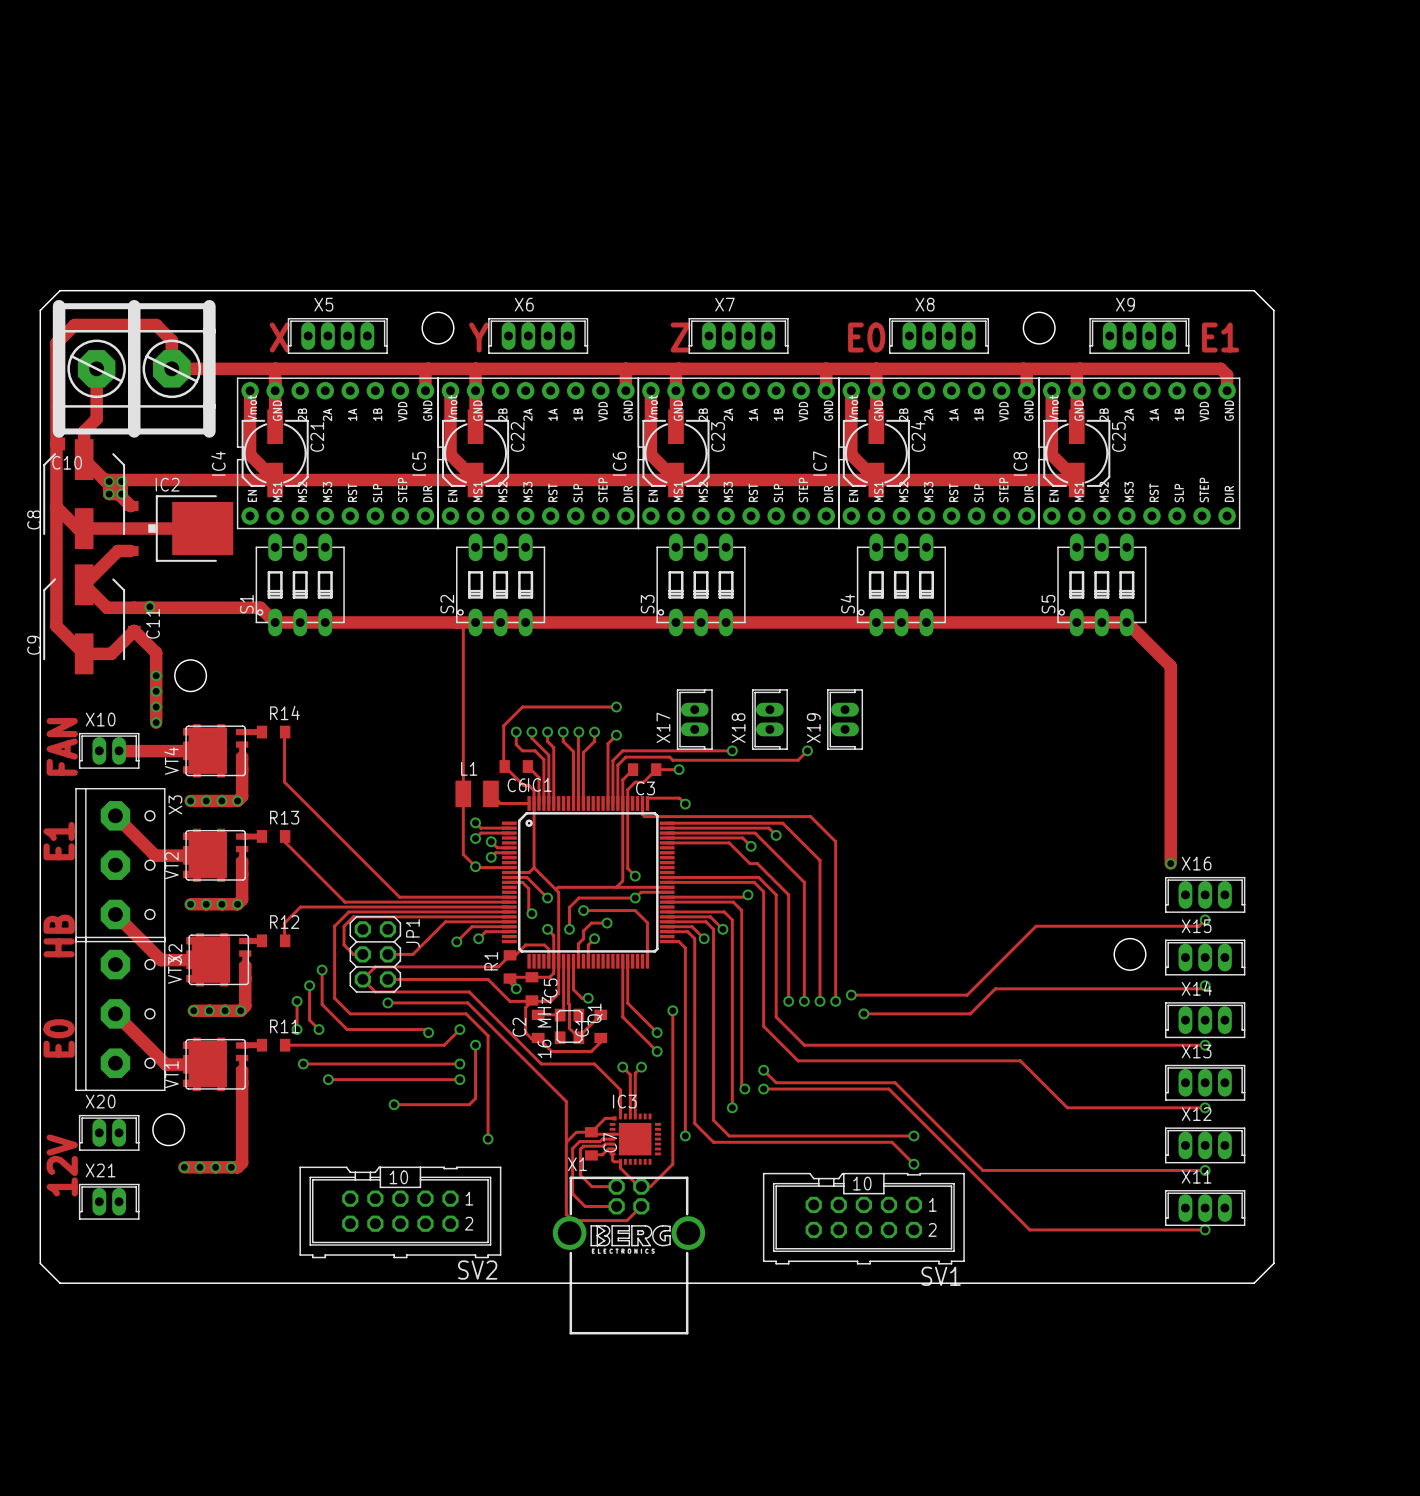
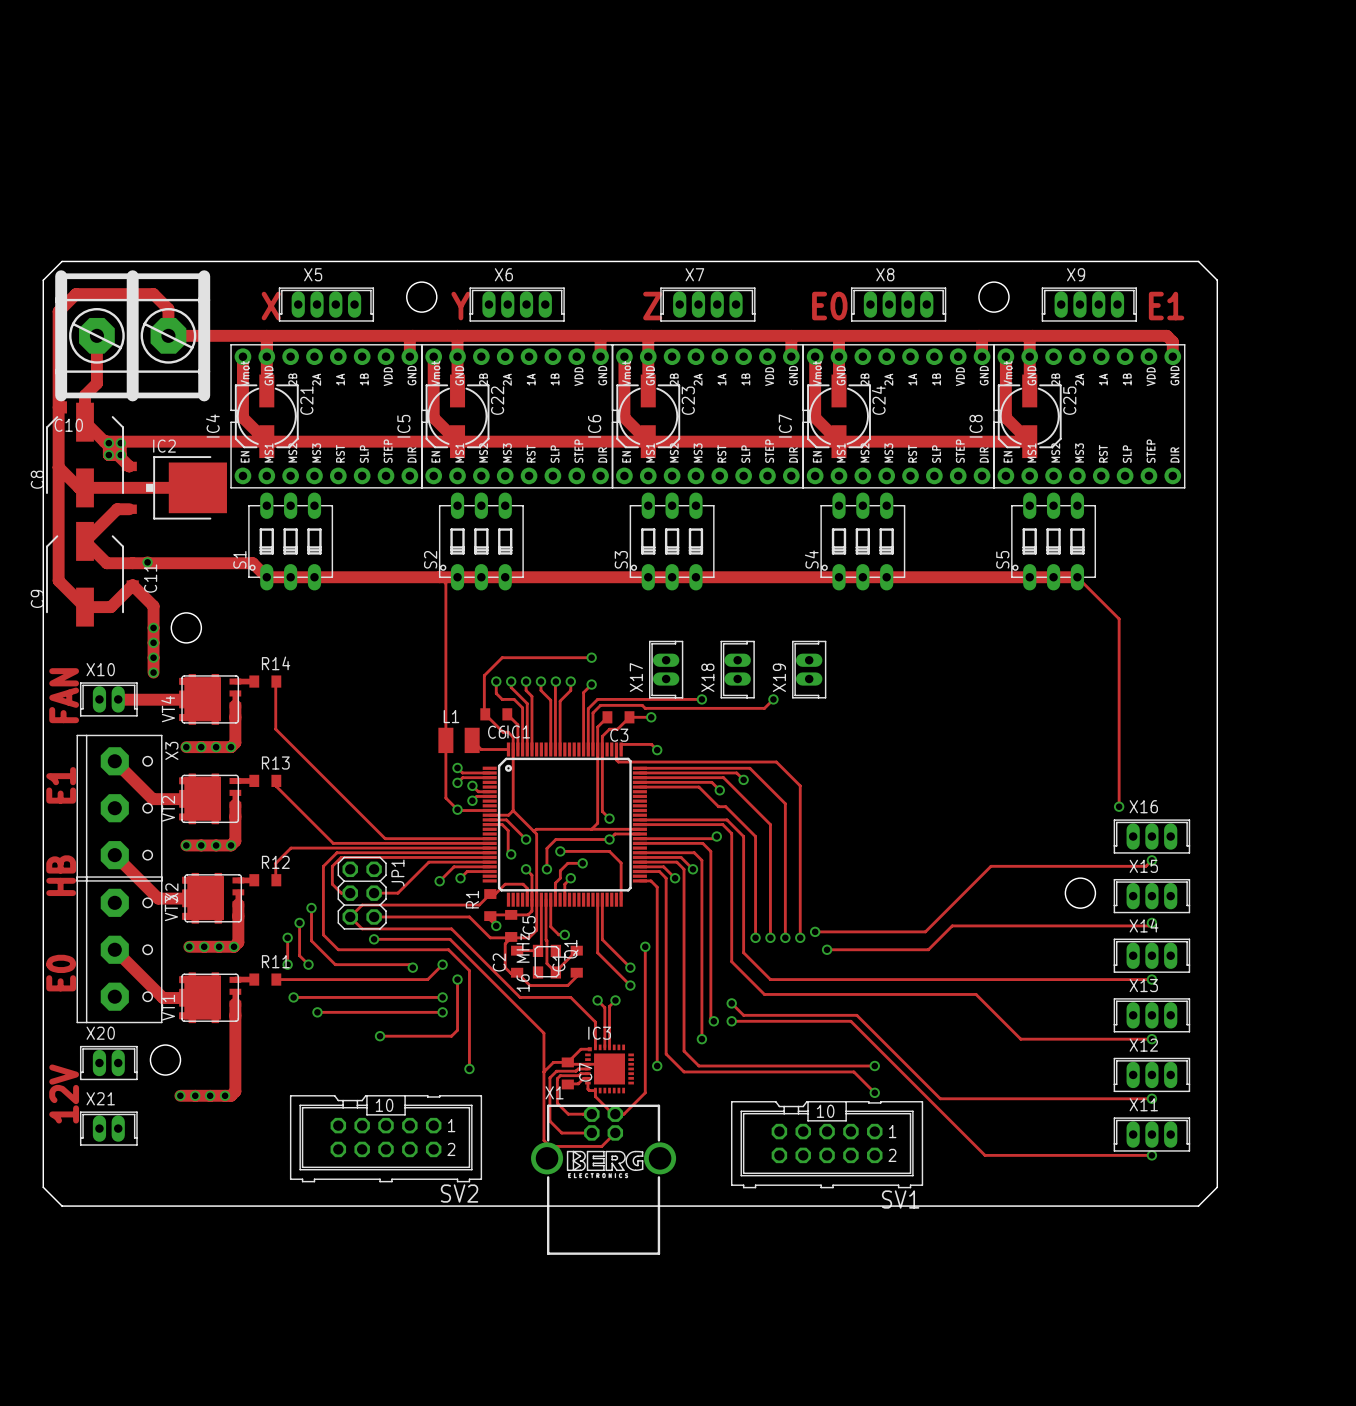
track width: thick (1126, 622) (1170, 666) (1170, 863) -> thin (1077, 577) (1119, 618) (1119, 806)

